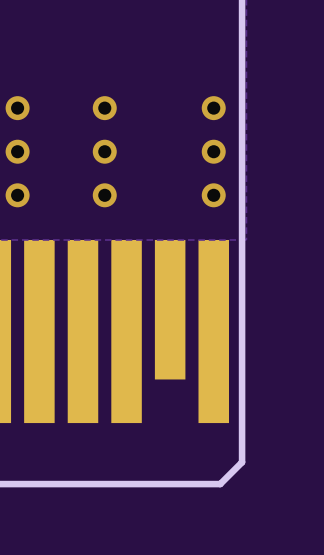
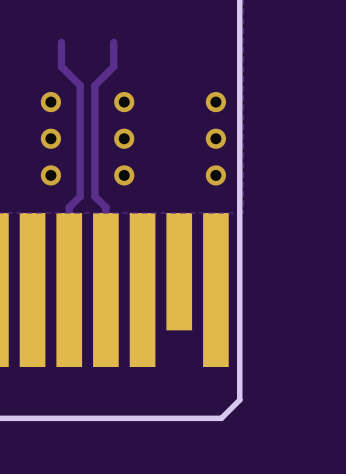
track: none -> (61, 42) (61, 66) (80, 85) (80, 196) (69, 207) (69, 290)
track: none -> (113, 42) (113, 66) (94, 85) (94, 196) (105, 207) (105, 290)

